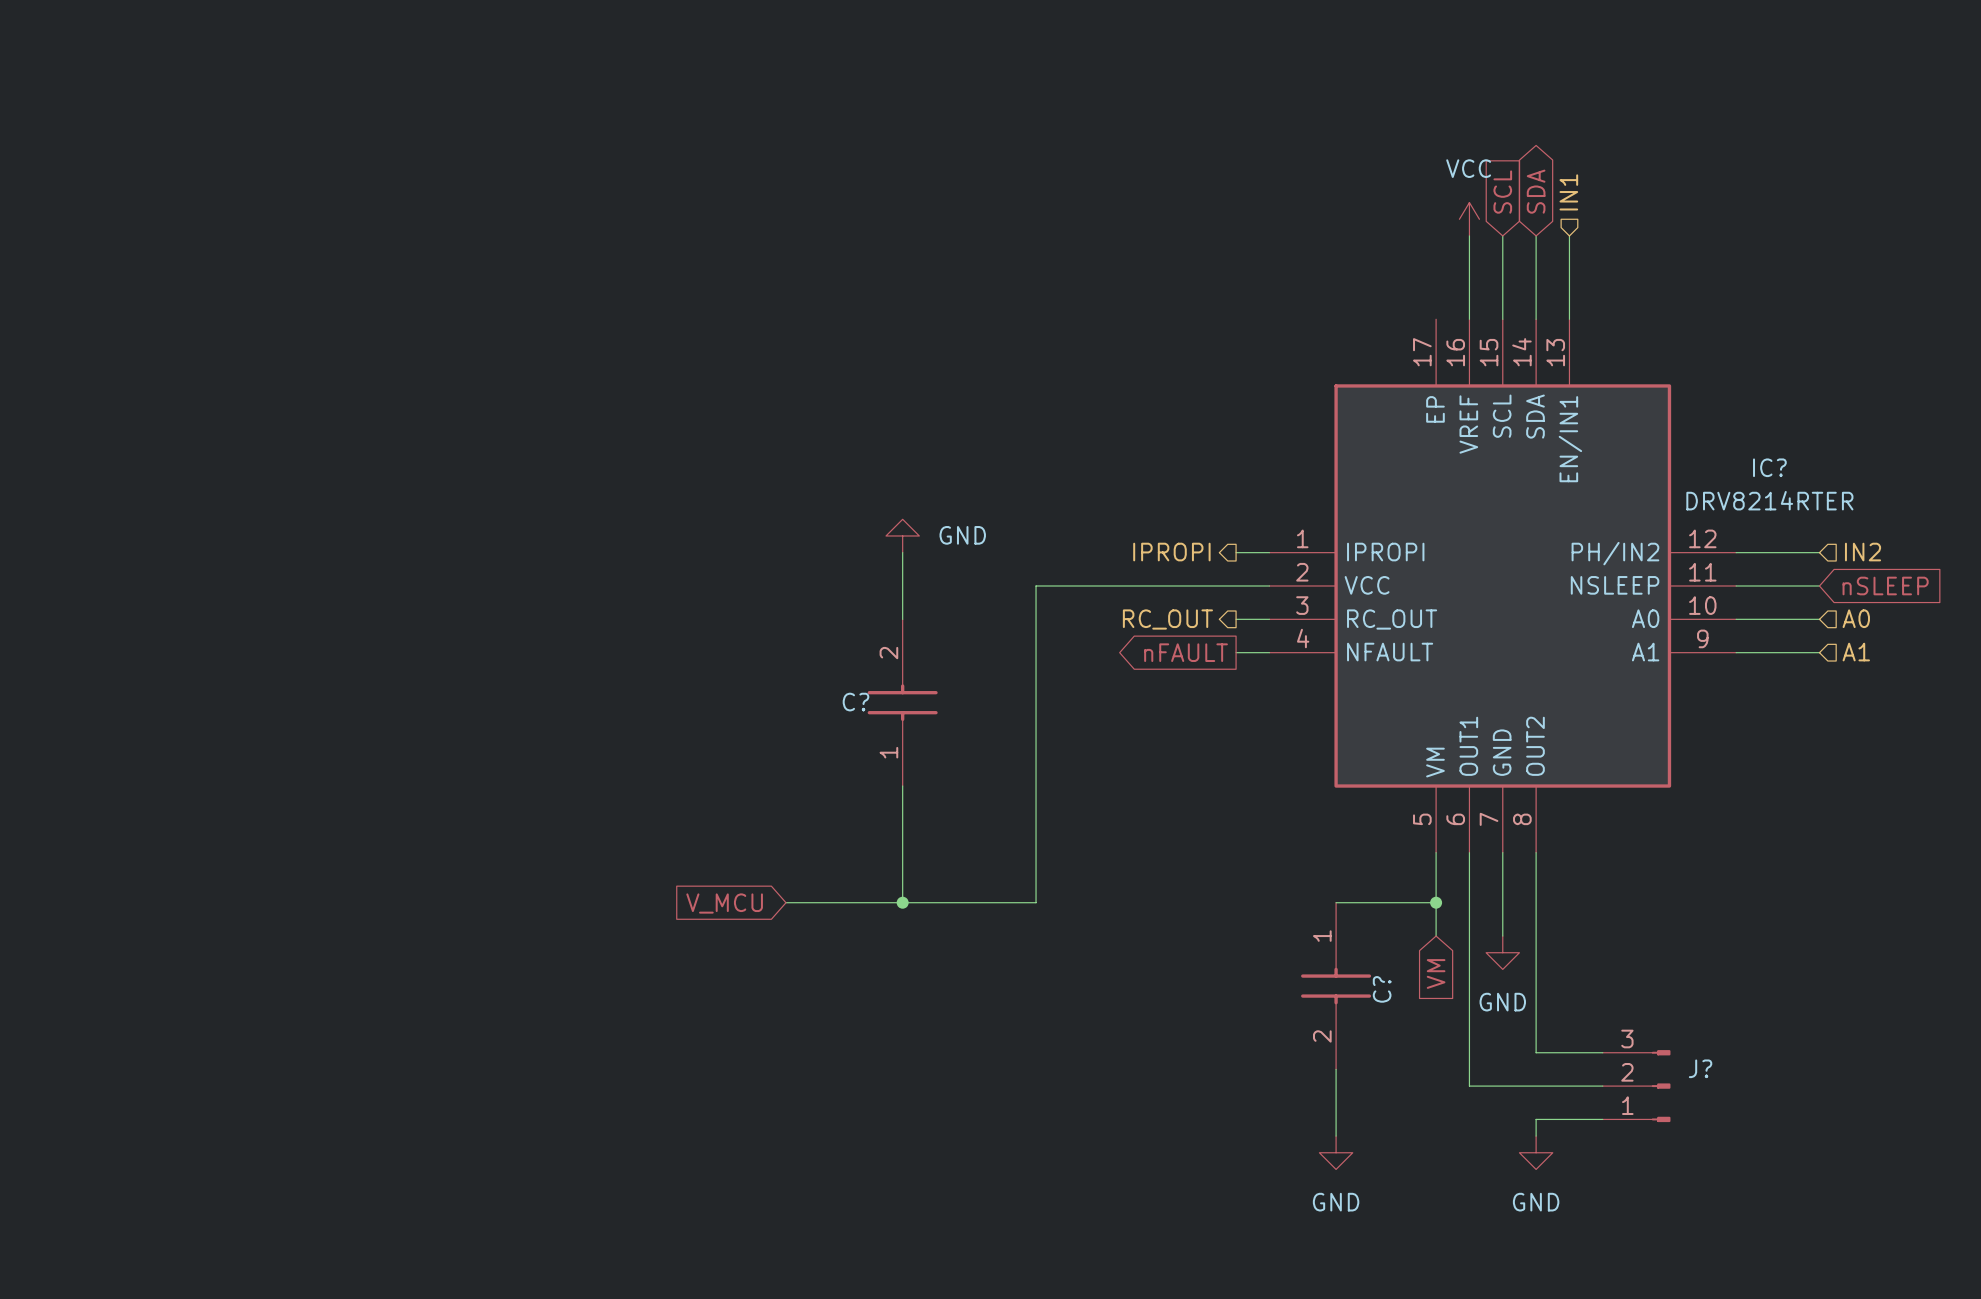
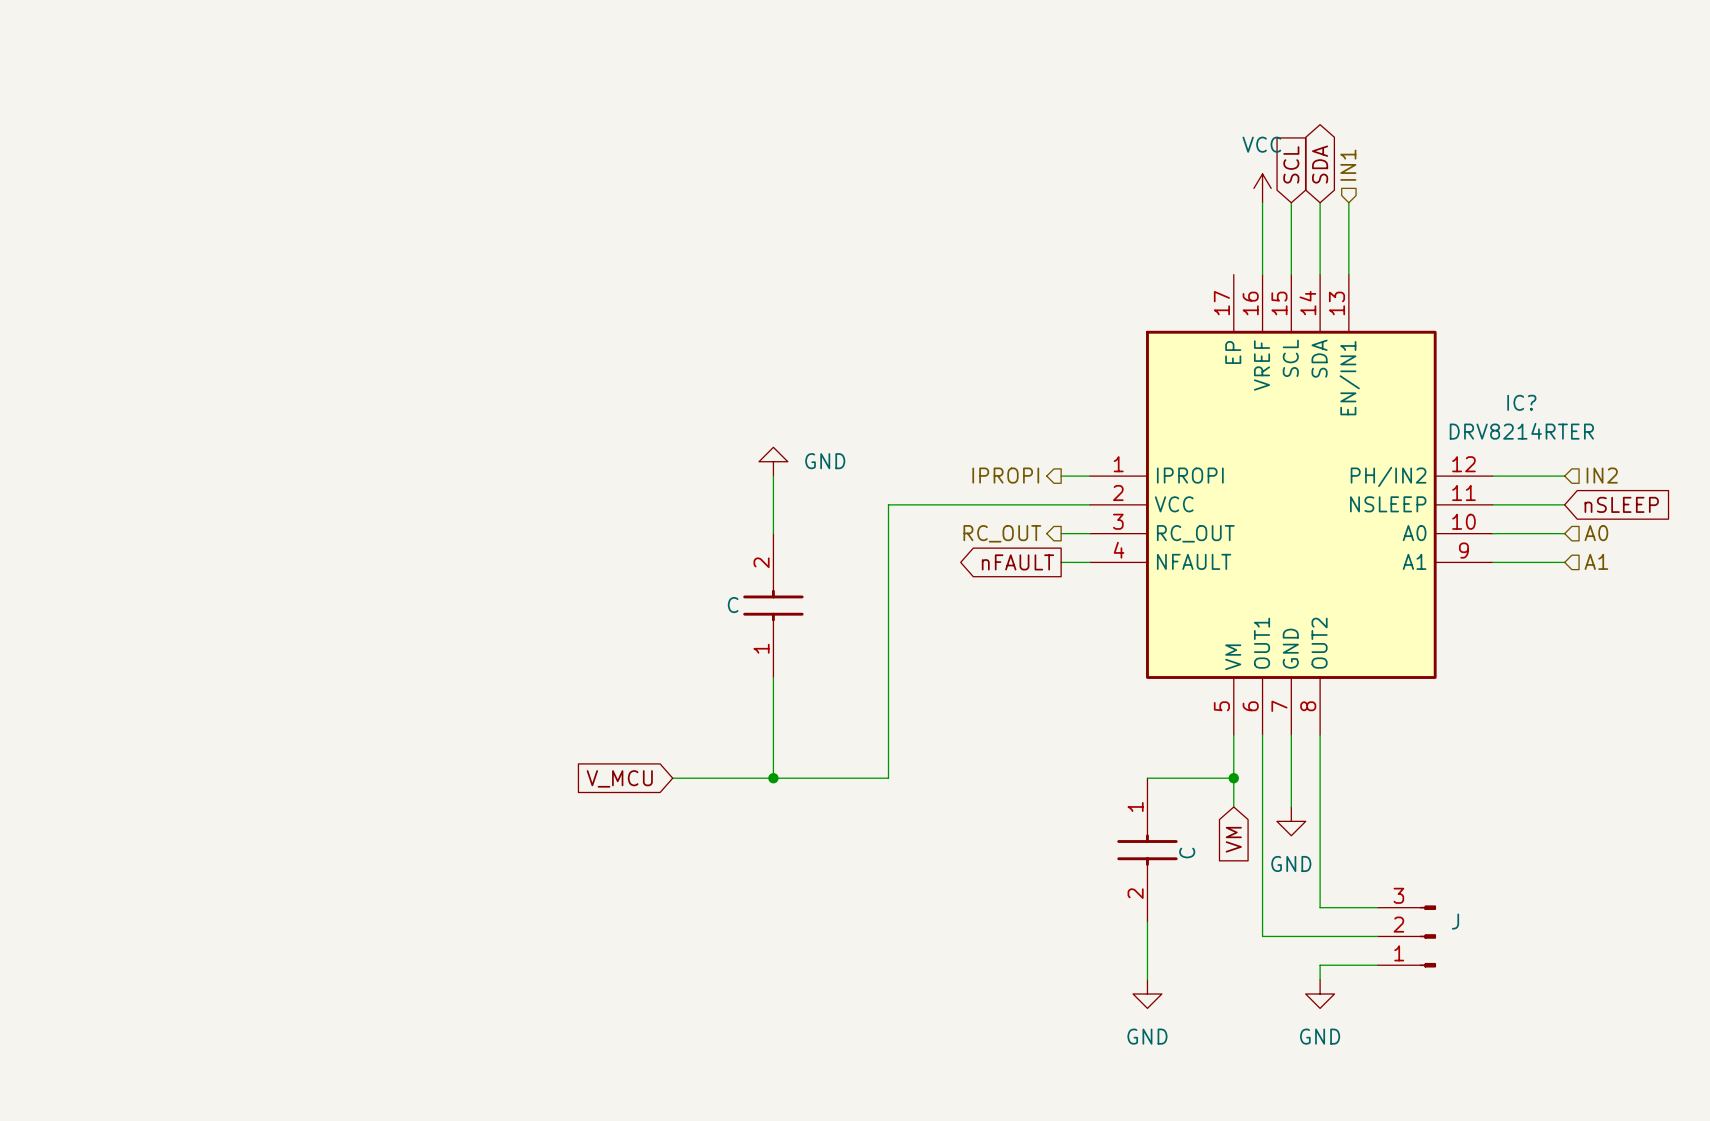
C? name: C? (855, 702) -> C (733, 605)
C? name: C? (1382, 989) -> C (1187, 853)
J? name: J? (1700, 1068) -> J (1455, 921)

